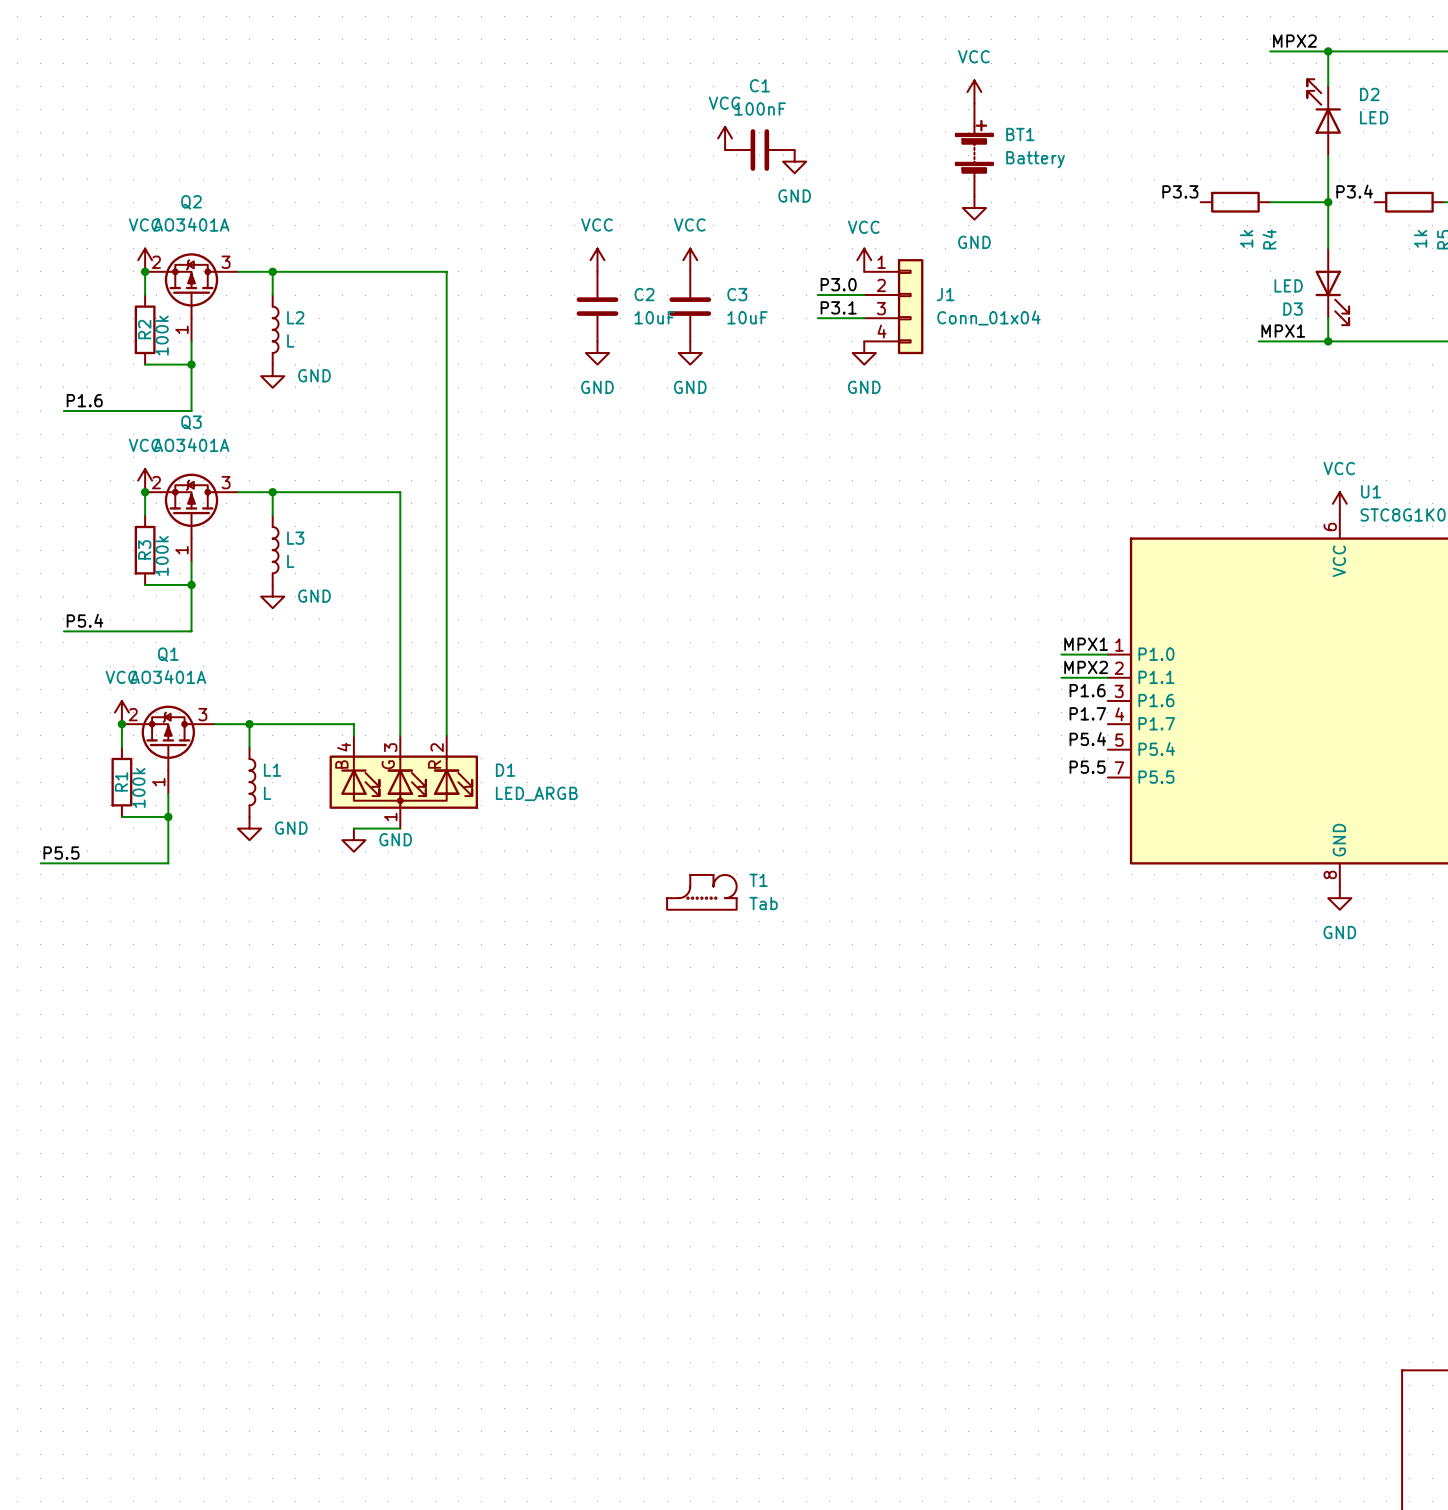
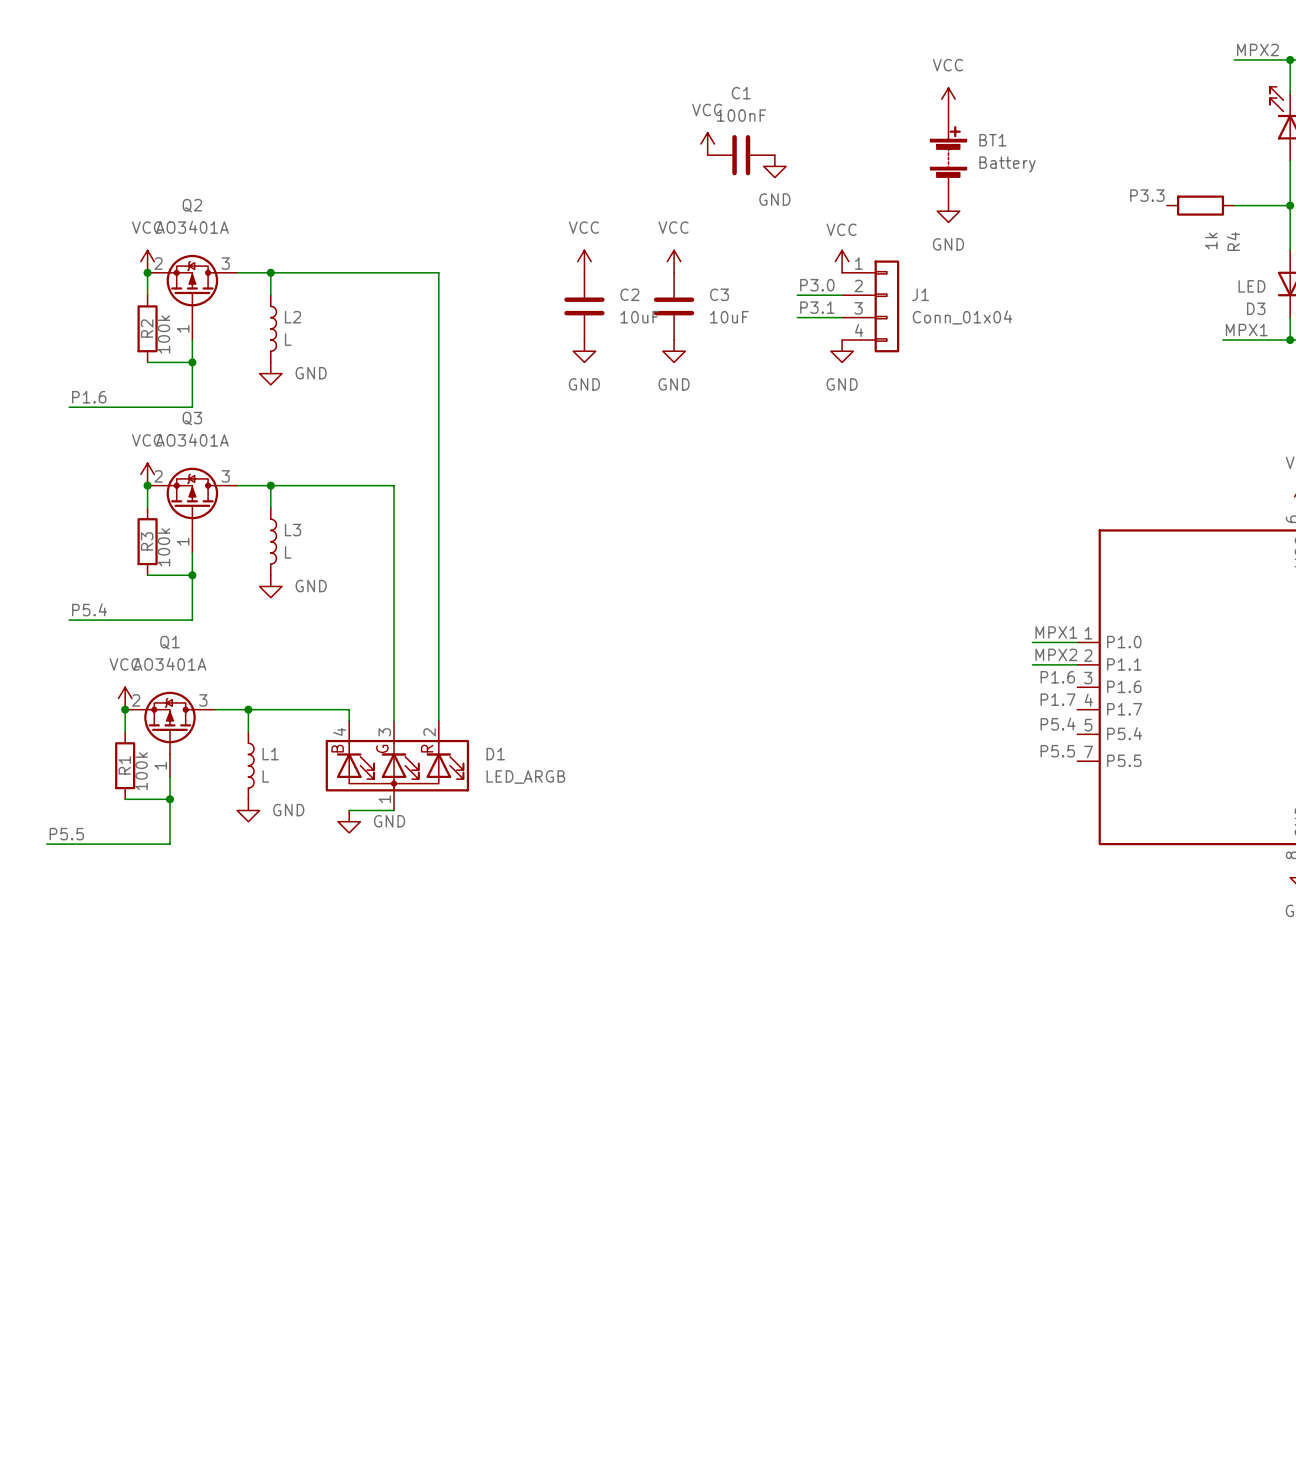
T1: Tab (701, 892) -> none

